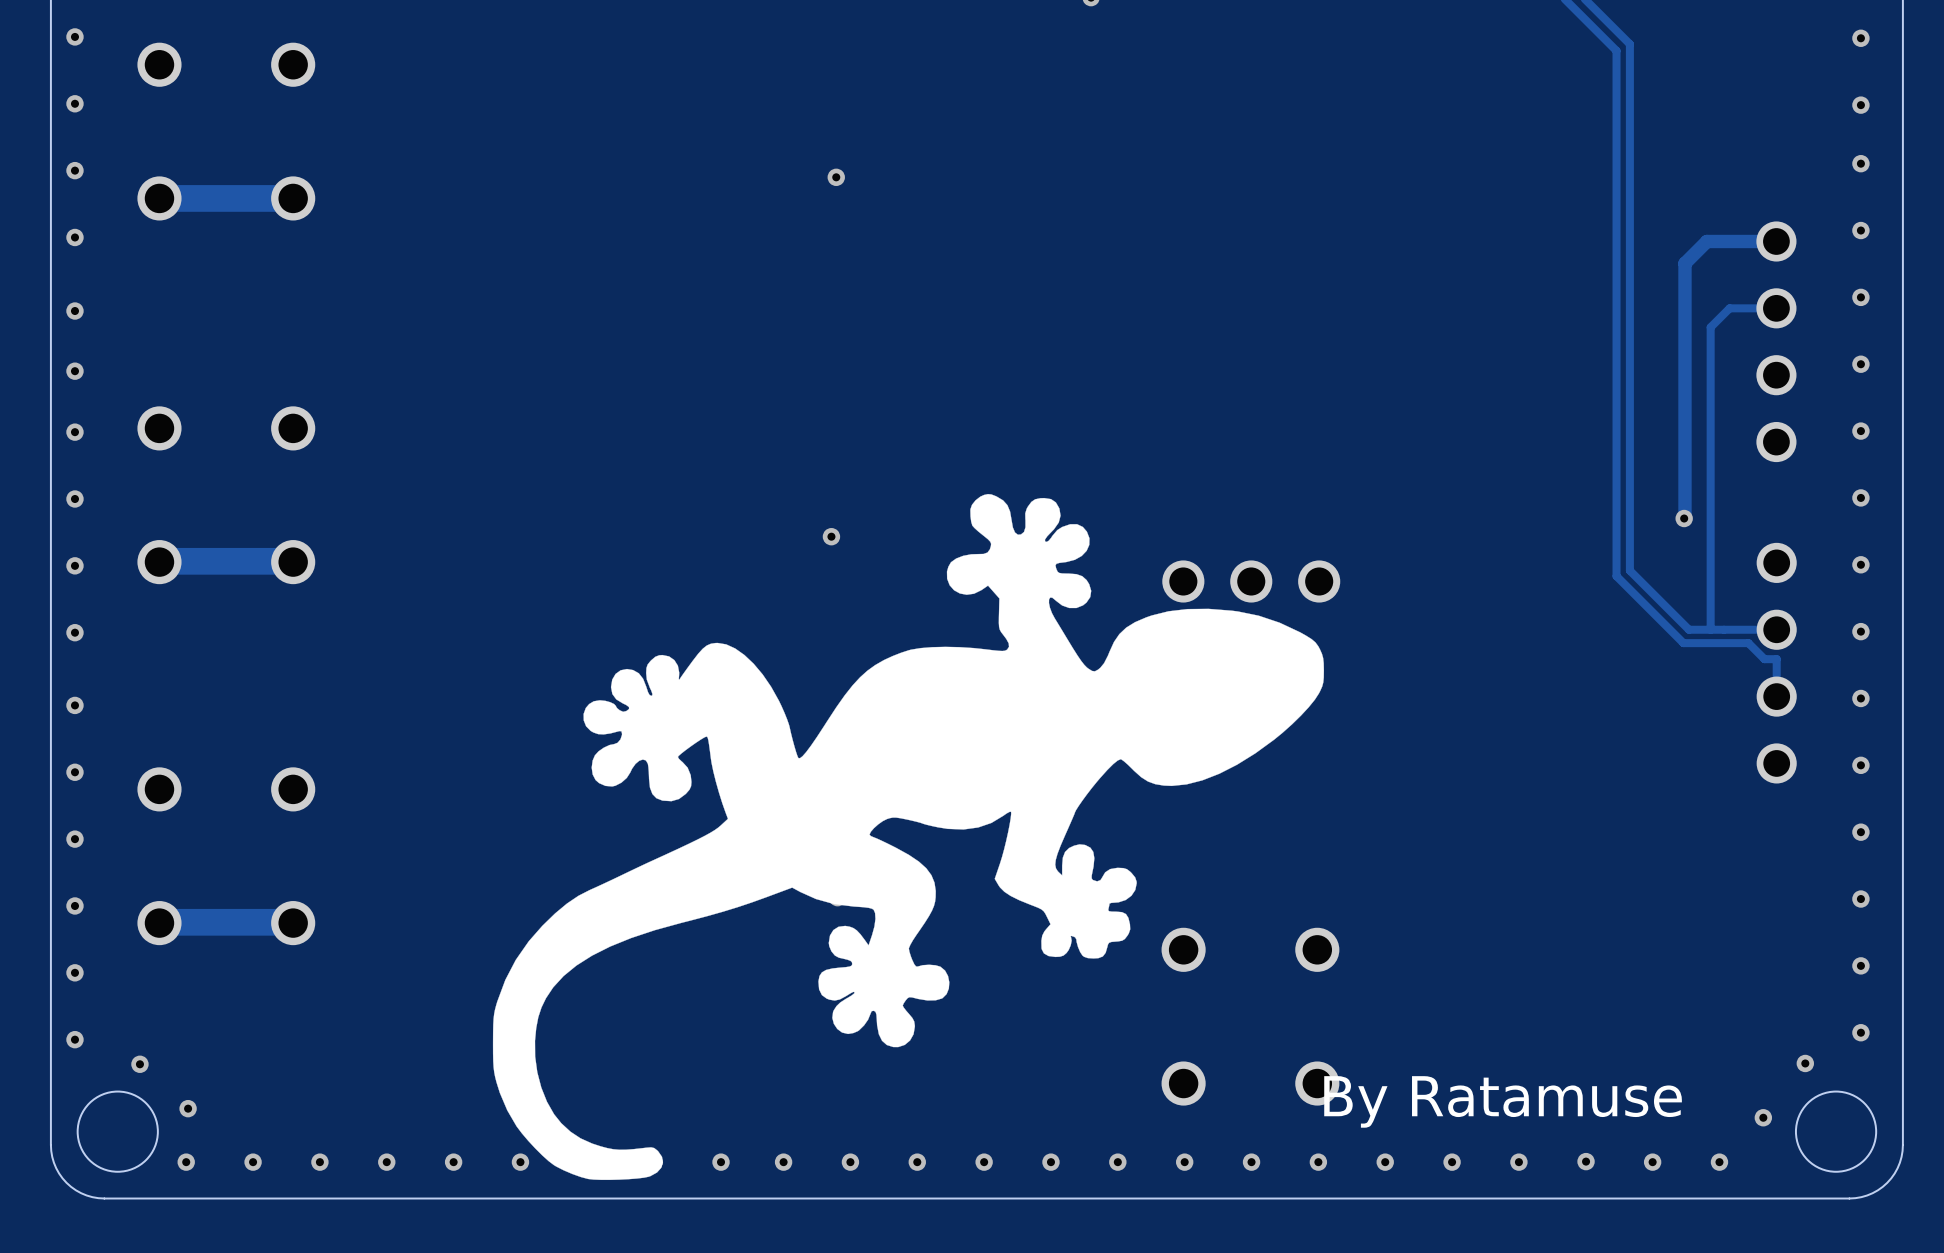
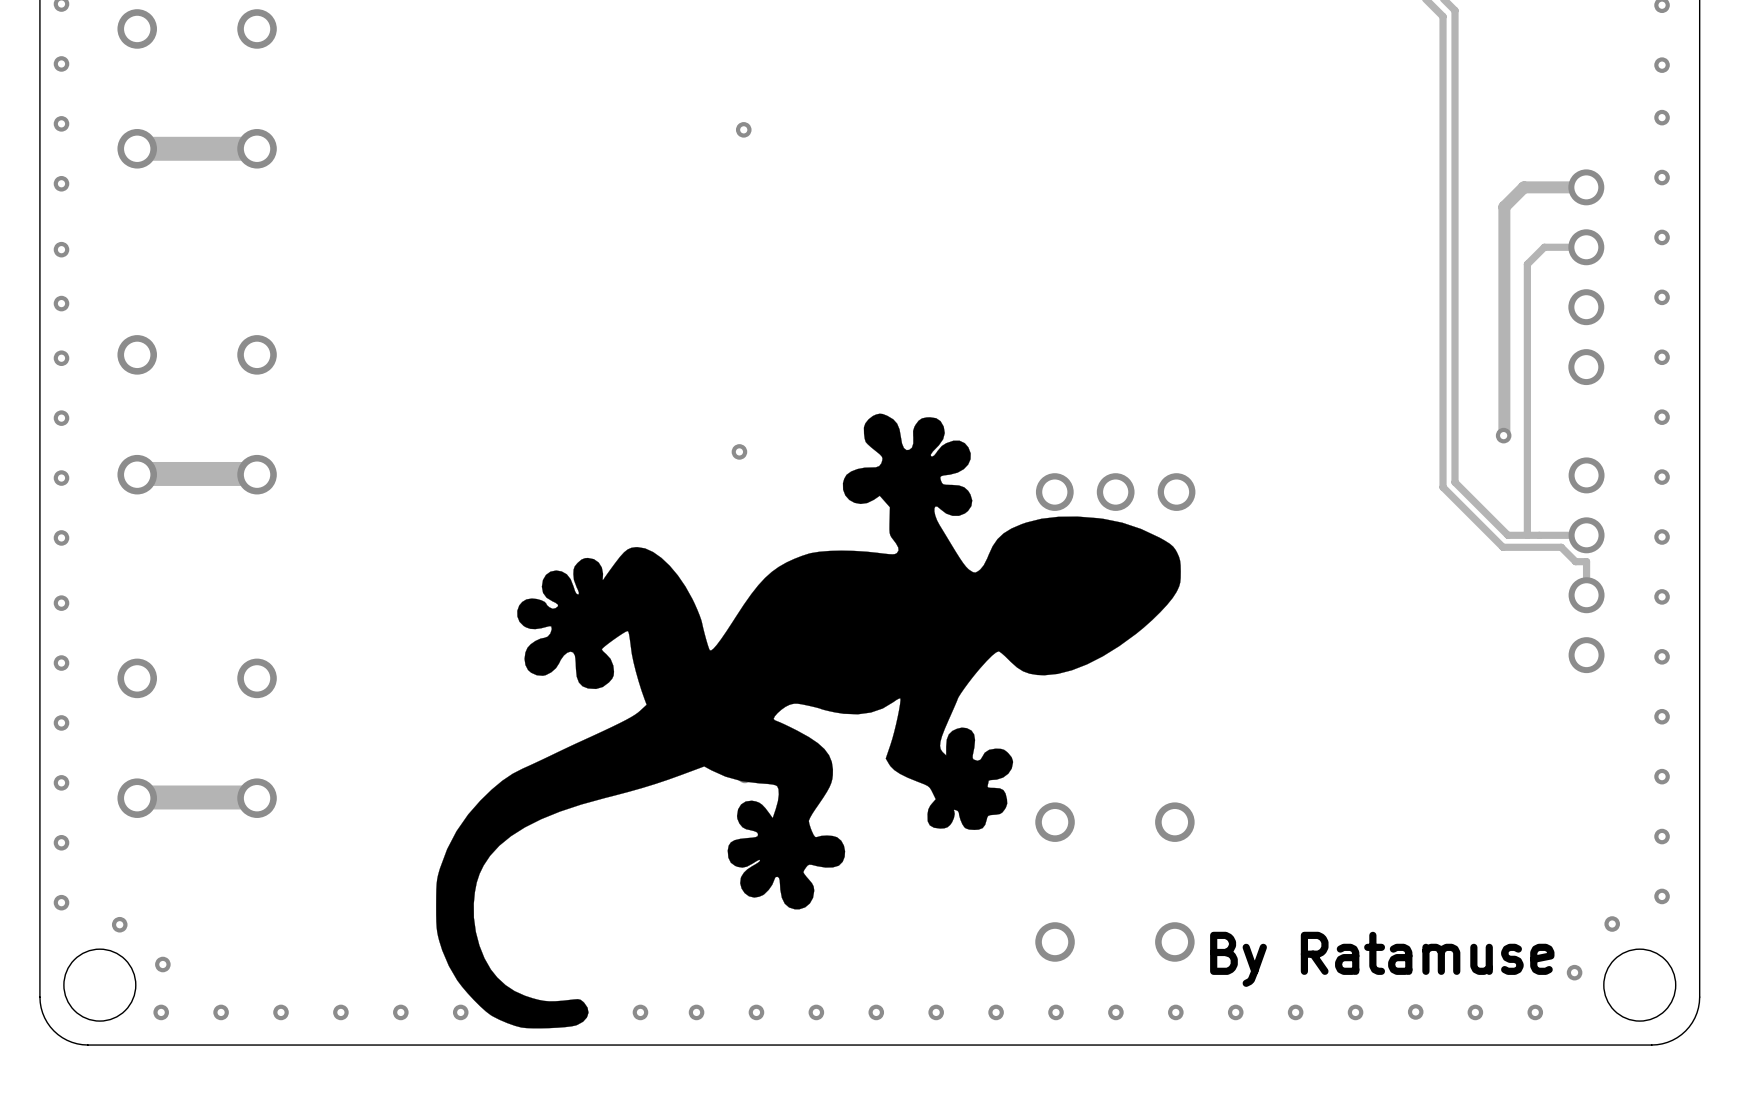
text position: By Ratamuse (1503, 1101) -> By Ratamuse (1382, 959)

